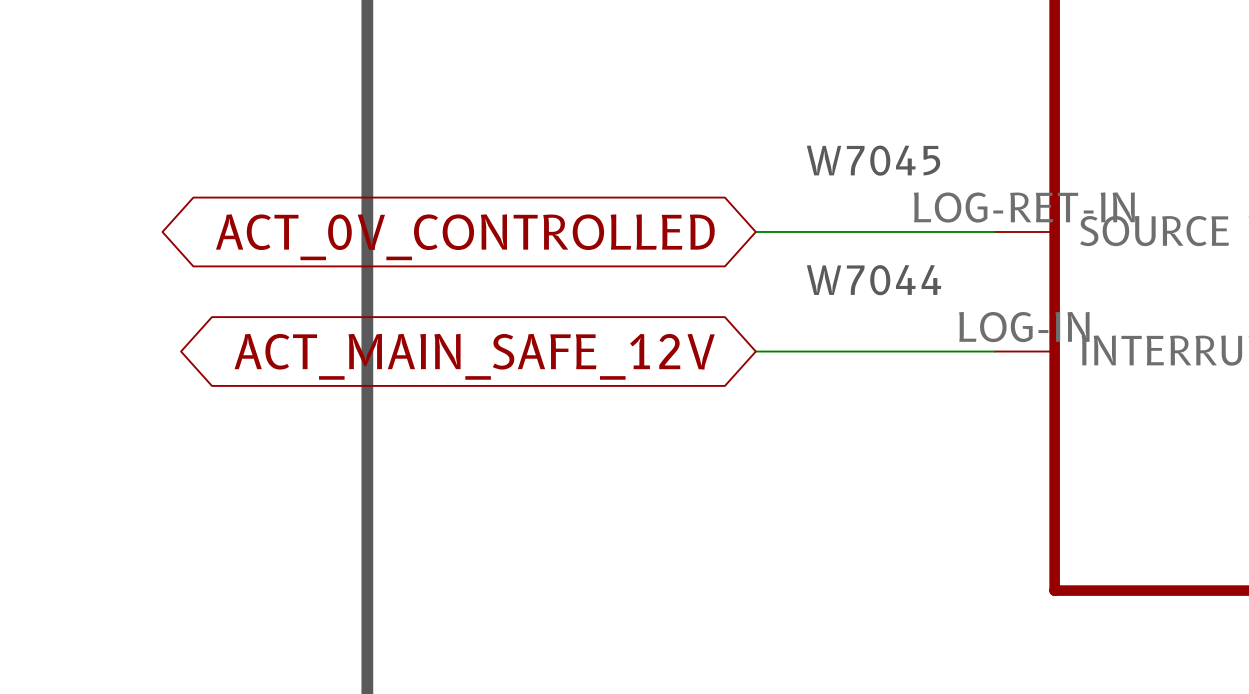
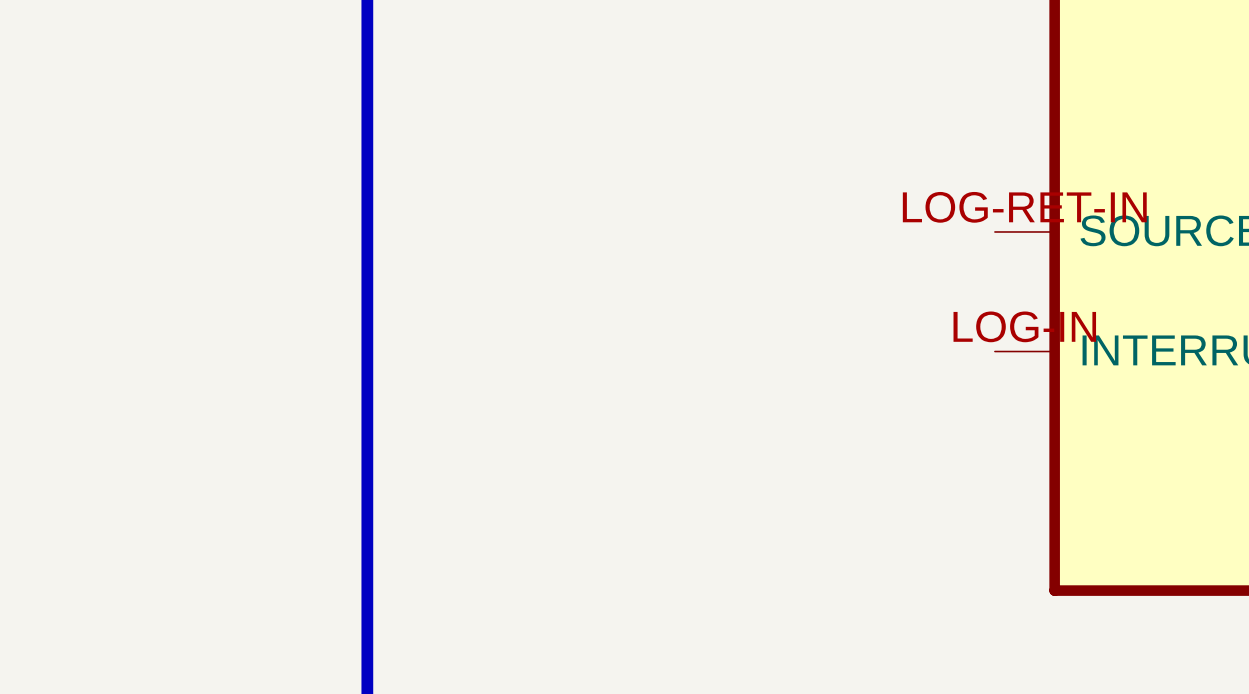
text: W7045 (873, 160) -> none
wire: (755, 231) (994, 231) -> none
global label: ACT_0V_CONTROLLED (465, 237) -> none
text: W7044 (874, 280) -> none
wire: (755, 351) (994, 351) -> none
global label: ACT_MAIN_SAFE_12V (474, 356) -> none

